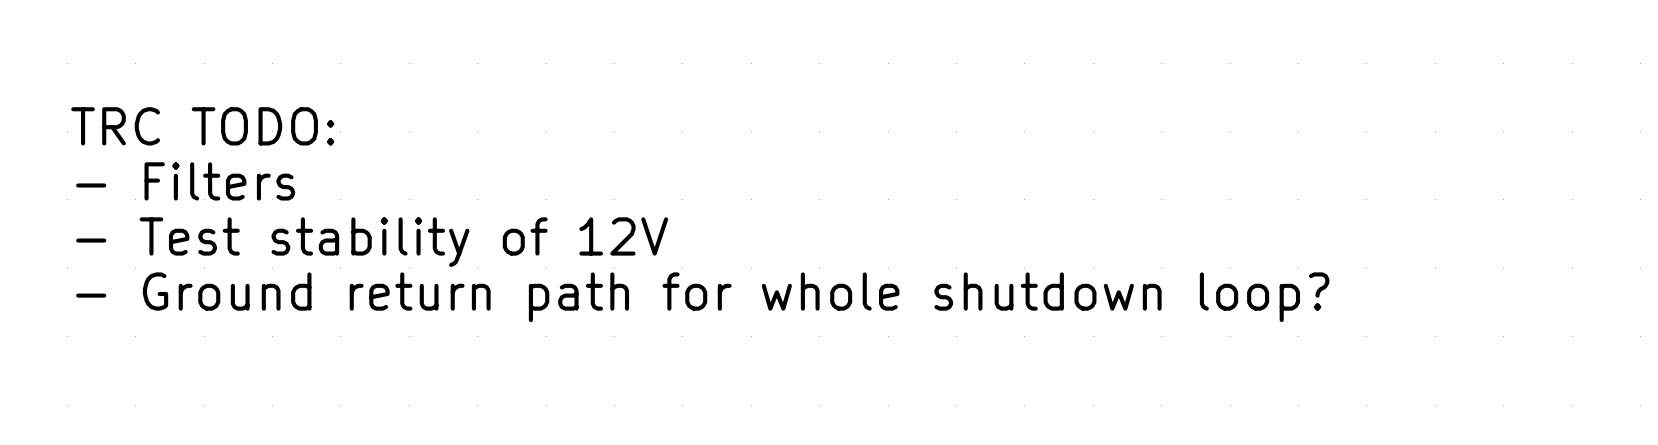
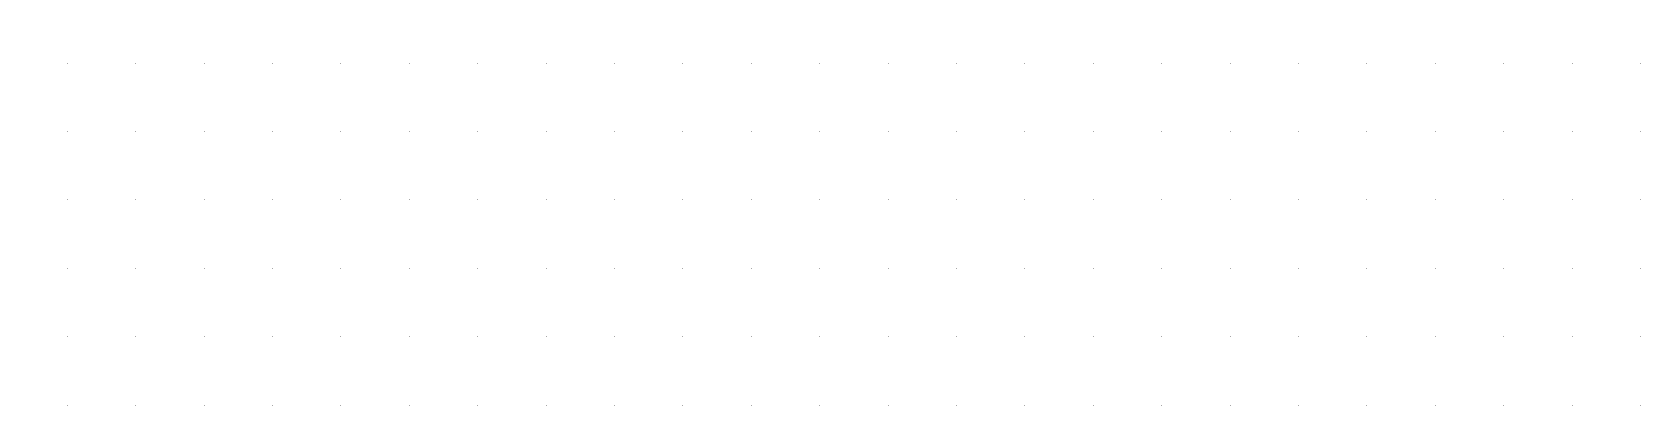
text: TRC TODO: (202, 126) -> none
text: - Filters (185, 181) -> none
text: - Test stability of 12V (372, 242) -> none
text: - Ground return path for whole shutdown loop? (702, 297) -> none

